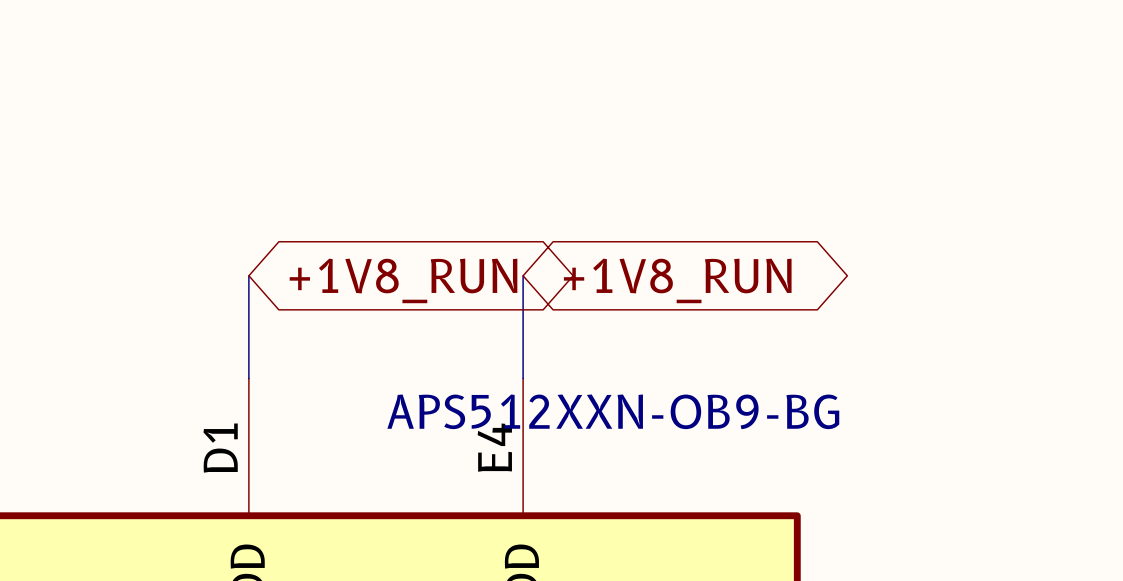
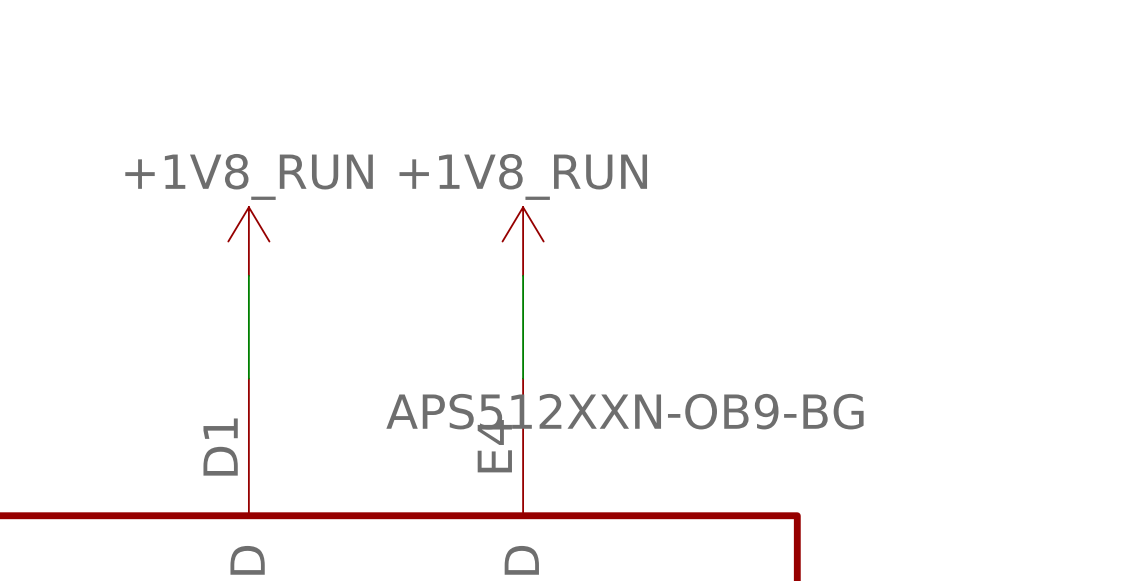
power symbol: none -> +1V8_RUN (248, 241)
power symbol: none -> +1V8_RUN (523, 241)
global label: +1V8_RUN (403, 280) -> none
global label: +1V8_RUN (677, 280) -> none

